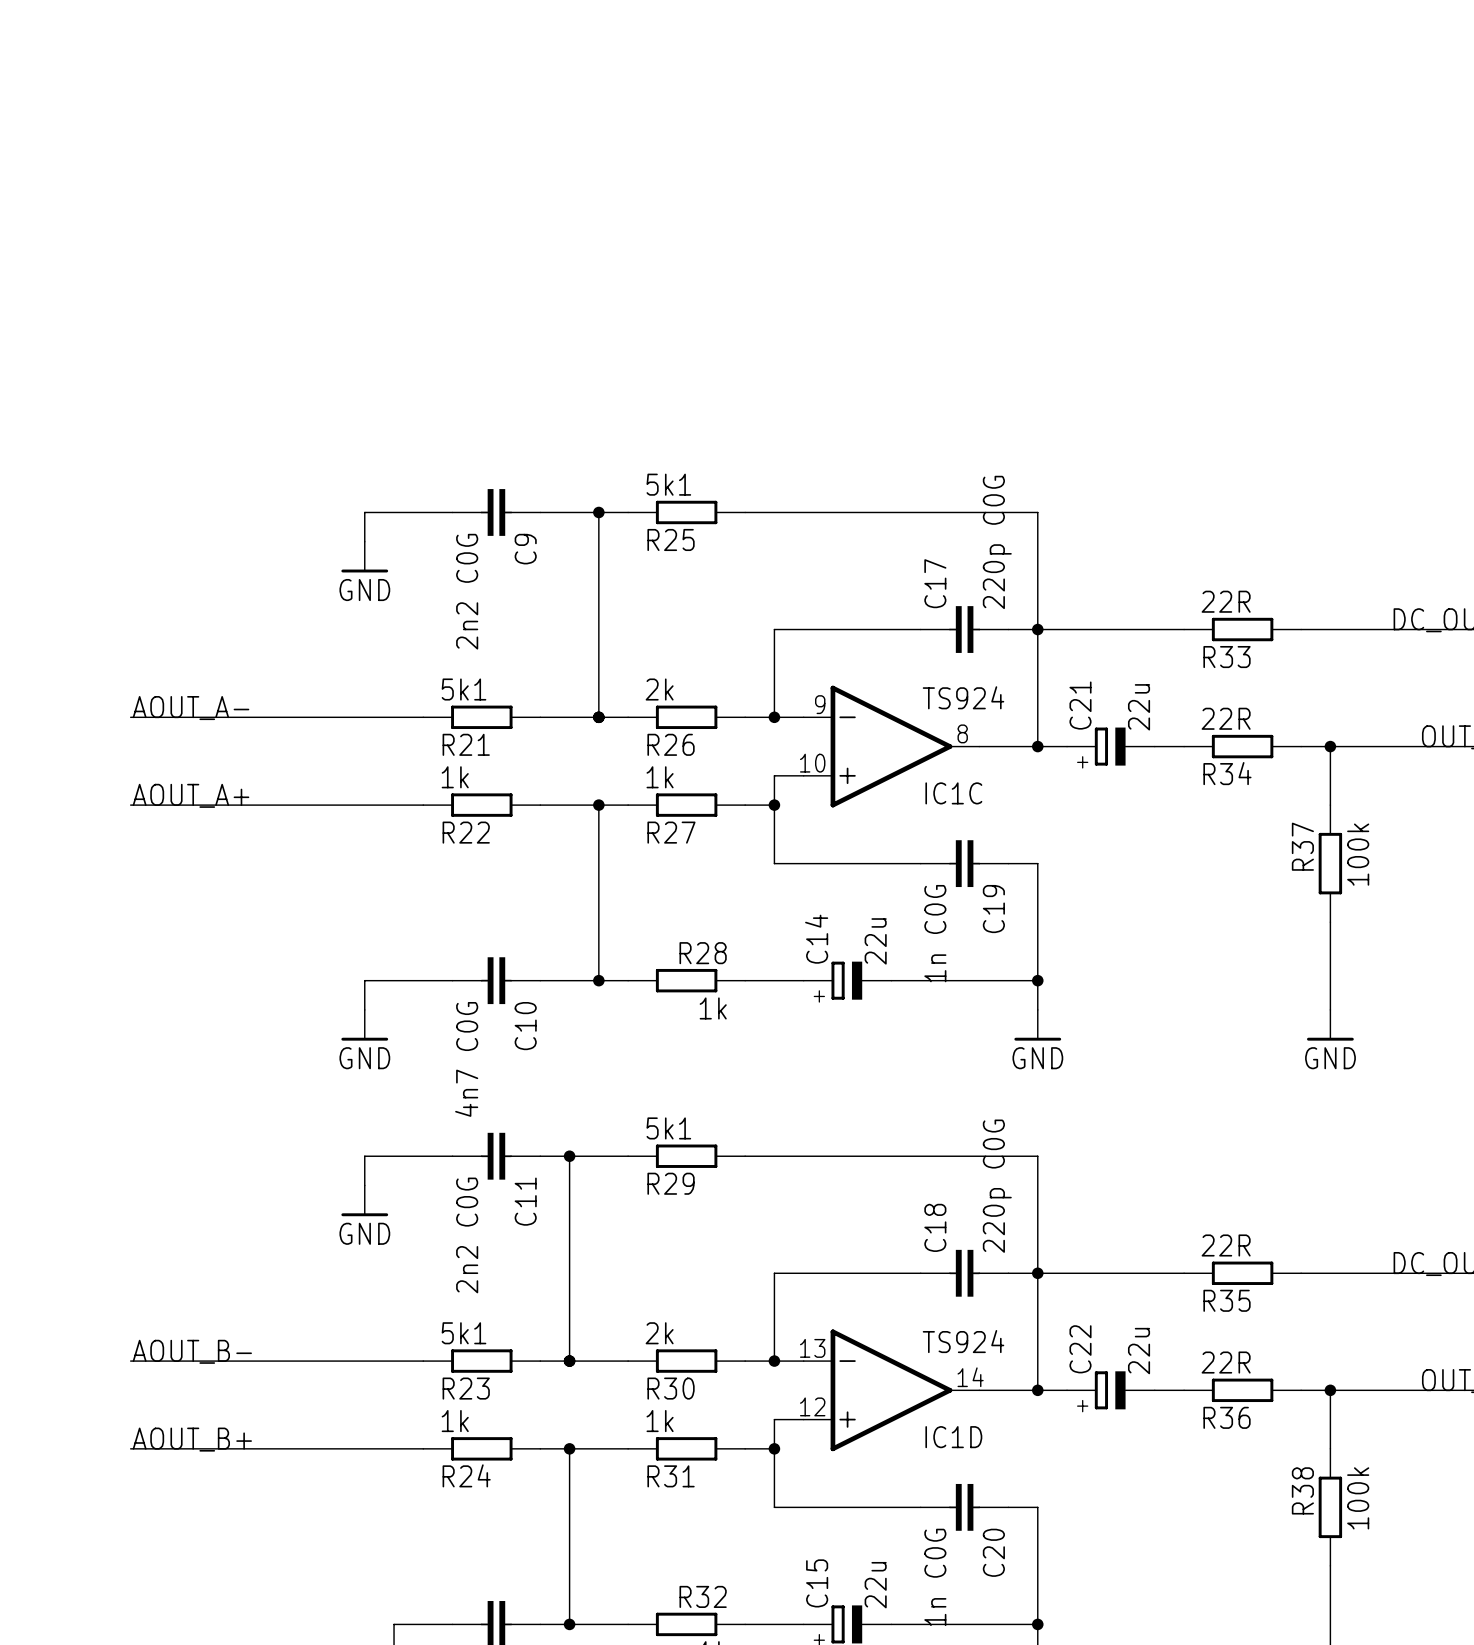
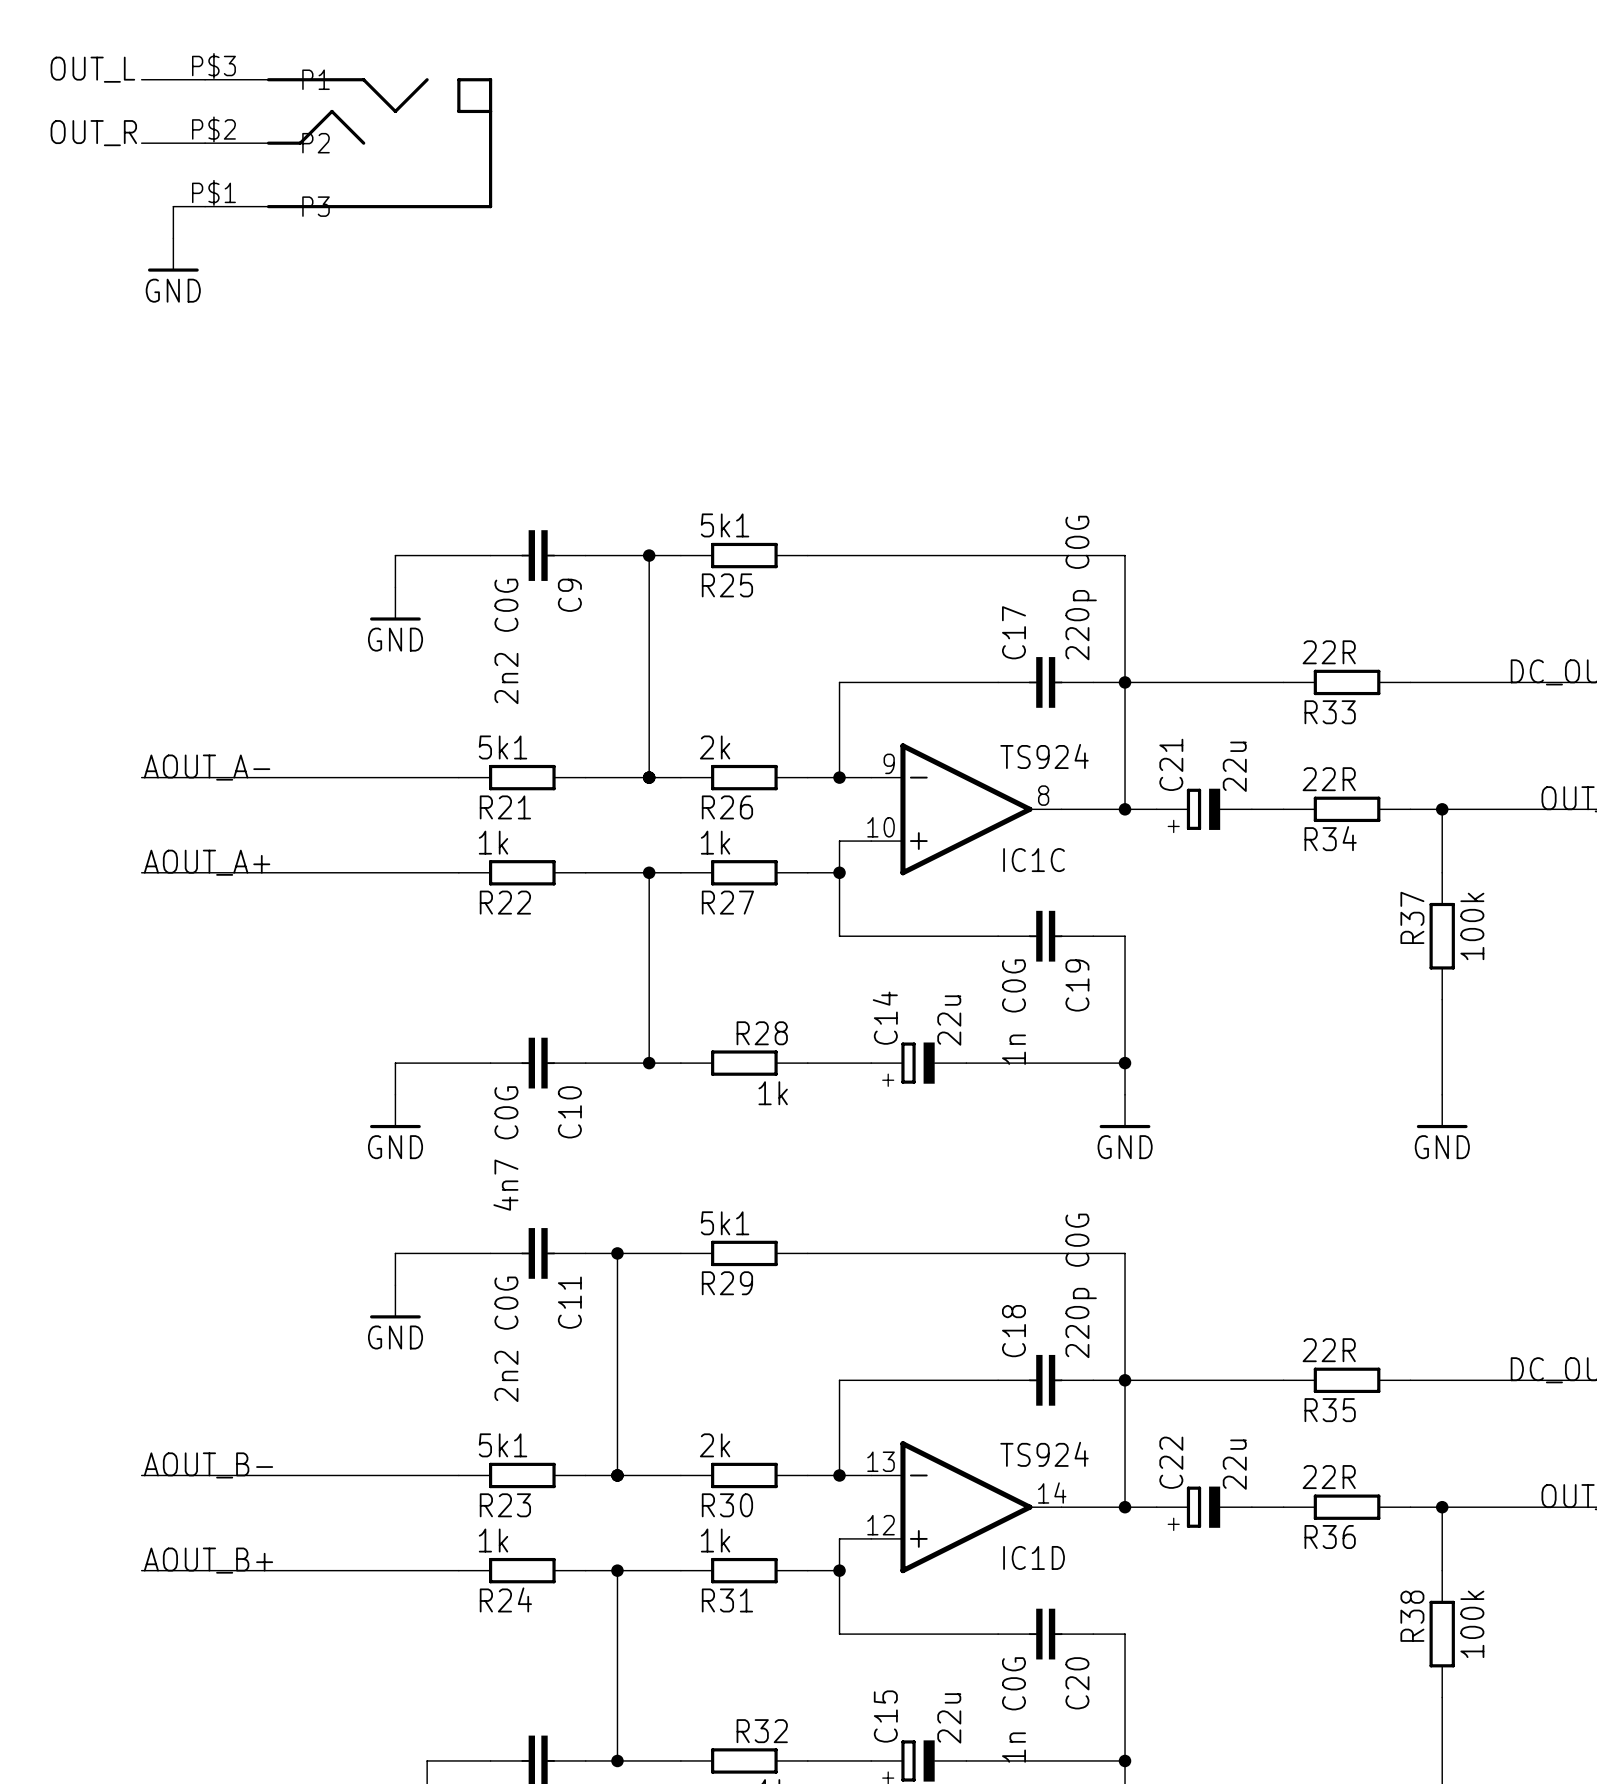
label: none -> OUT_L (92, 69)
wire: none -> (141, 79) (205, 79)
label: none -> OUT_R (93, 133)
wire: none -> (141, 143) (205, 143)
part: none -> (348, 143)
wire: none -> (205, 206) (173, 206) (173, 238)
power symbol: none -> GND (173, 255)

